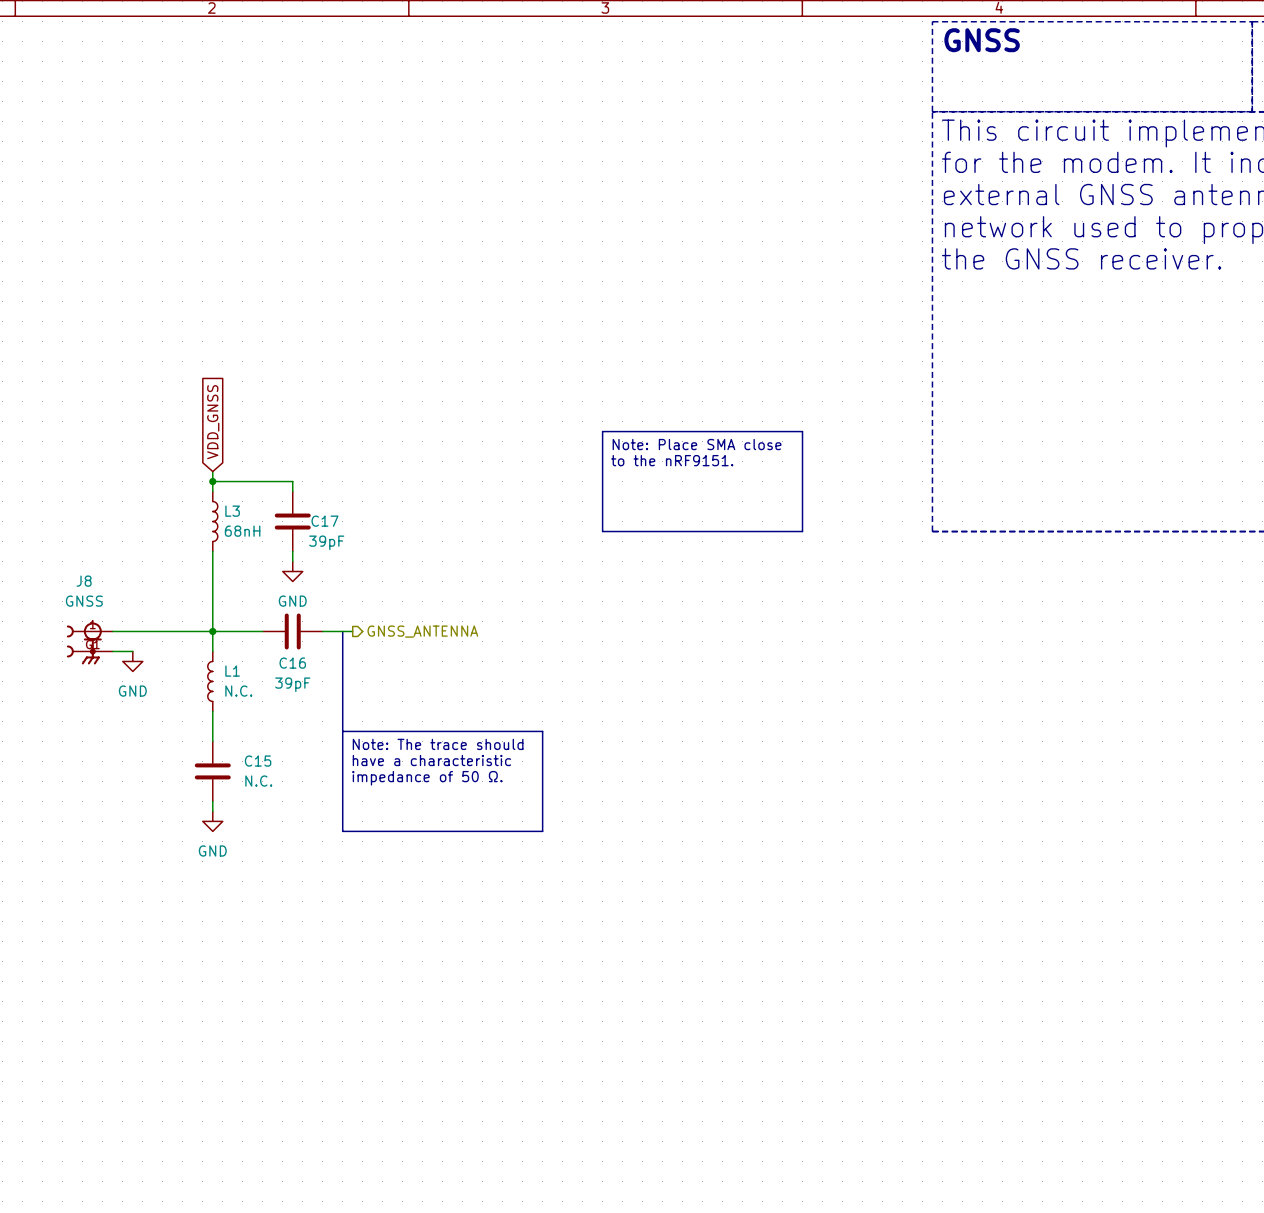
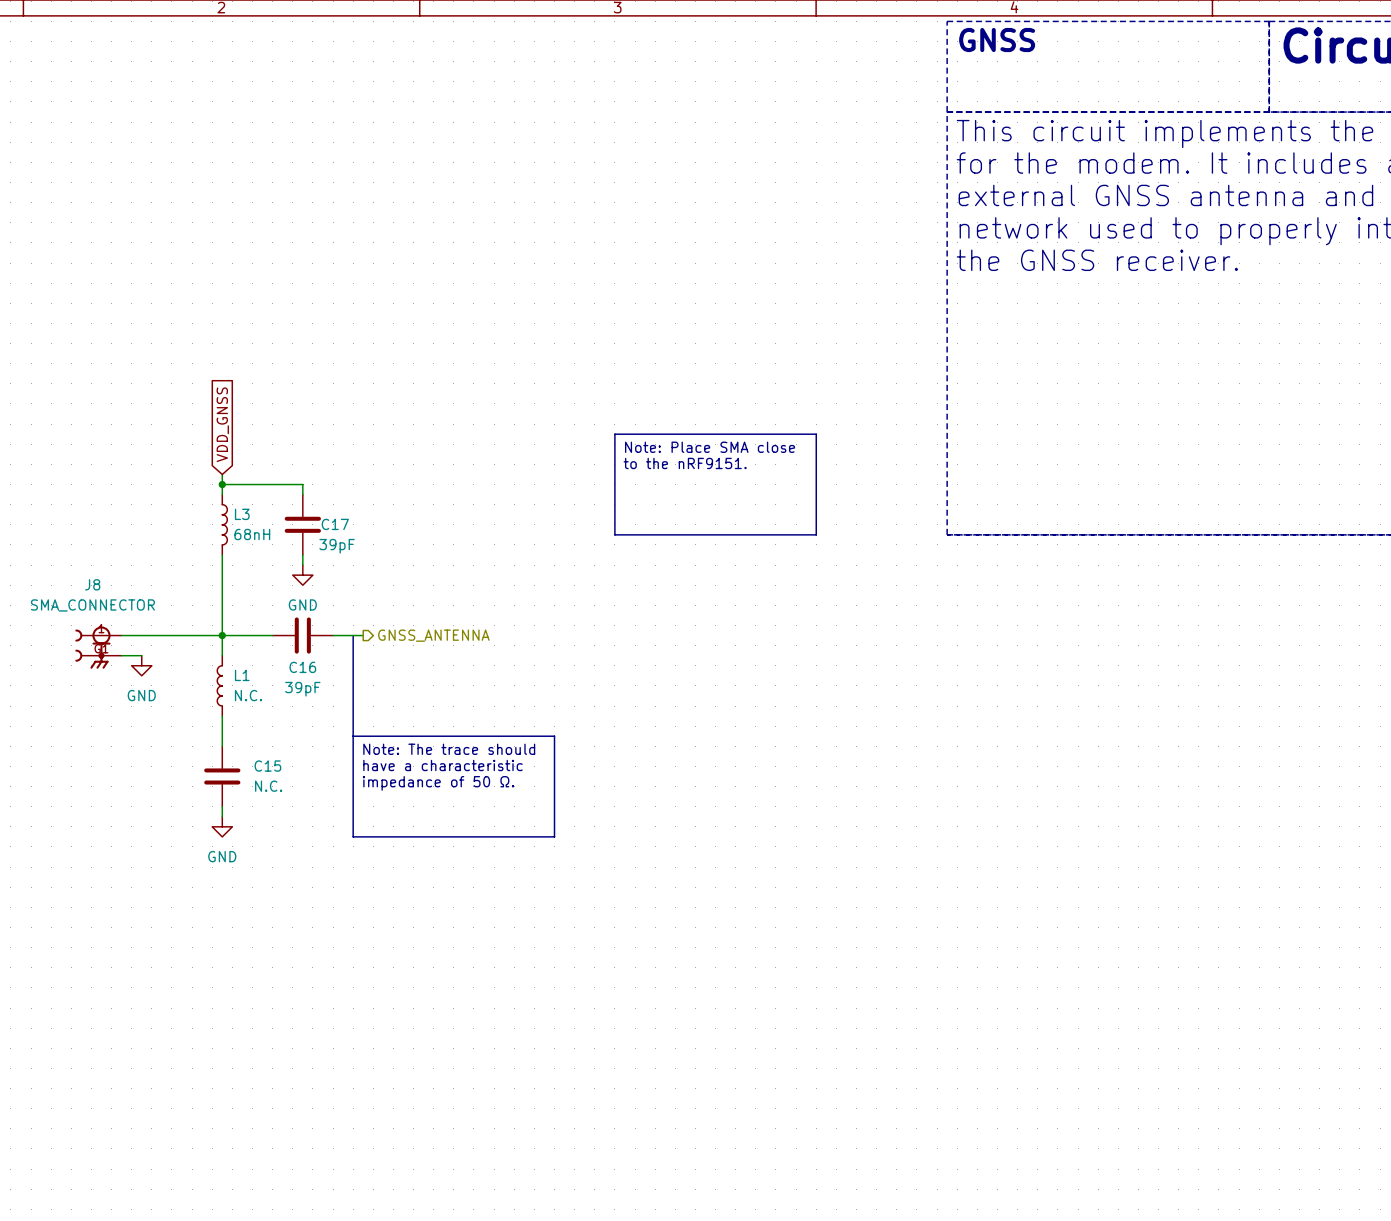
J8 value: GNSS (84, 601) -> SMA_CONNECTOR (92, 605)

